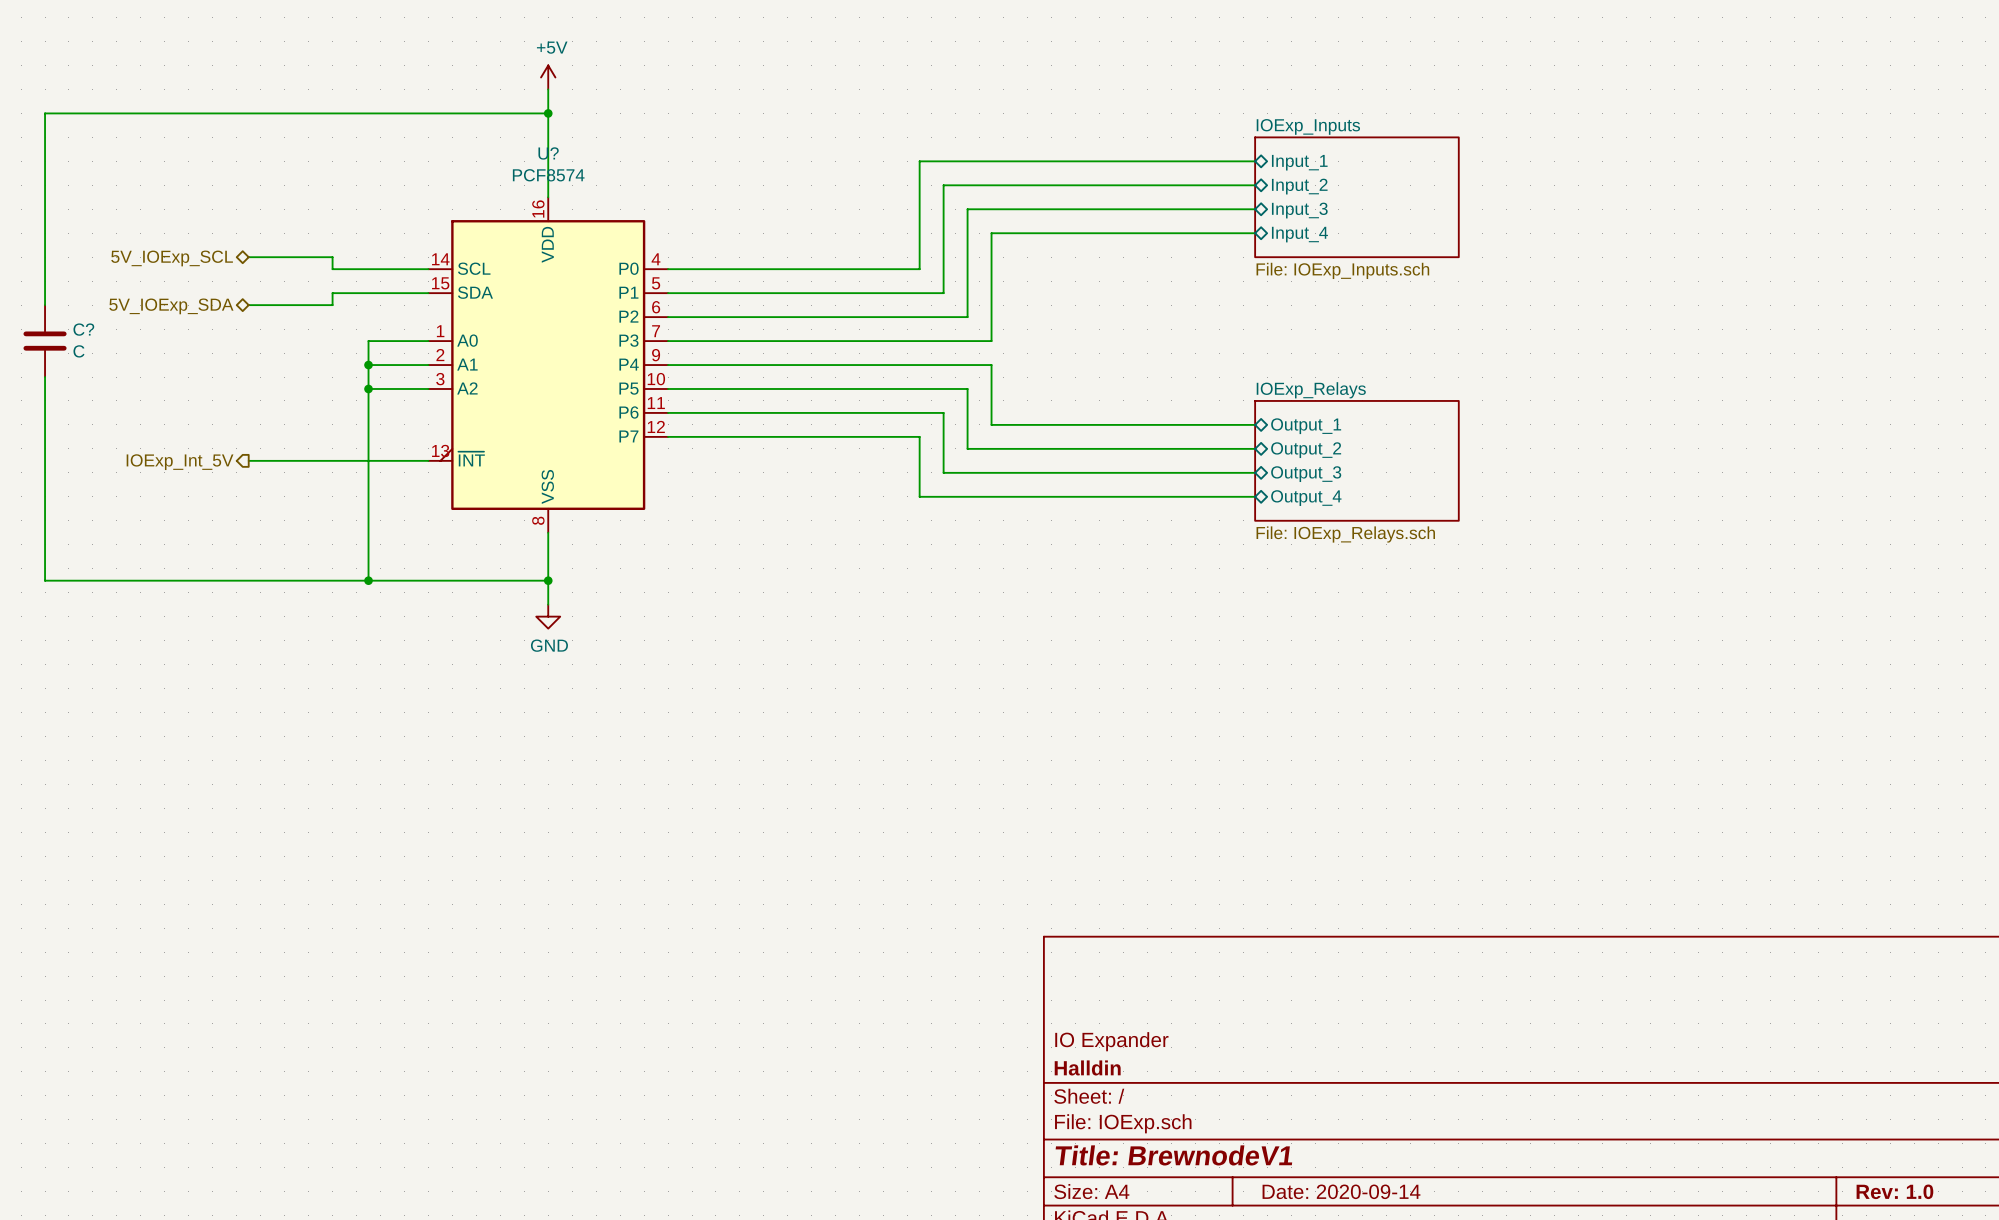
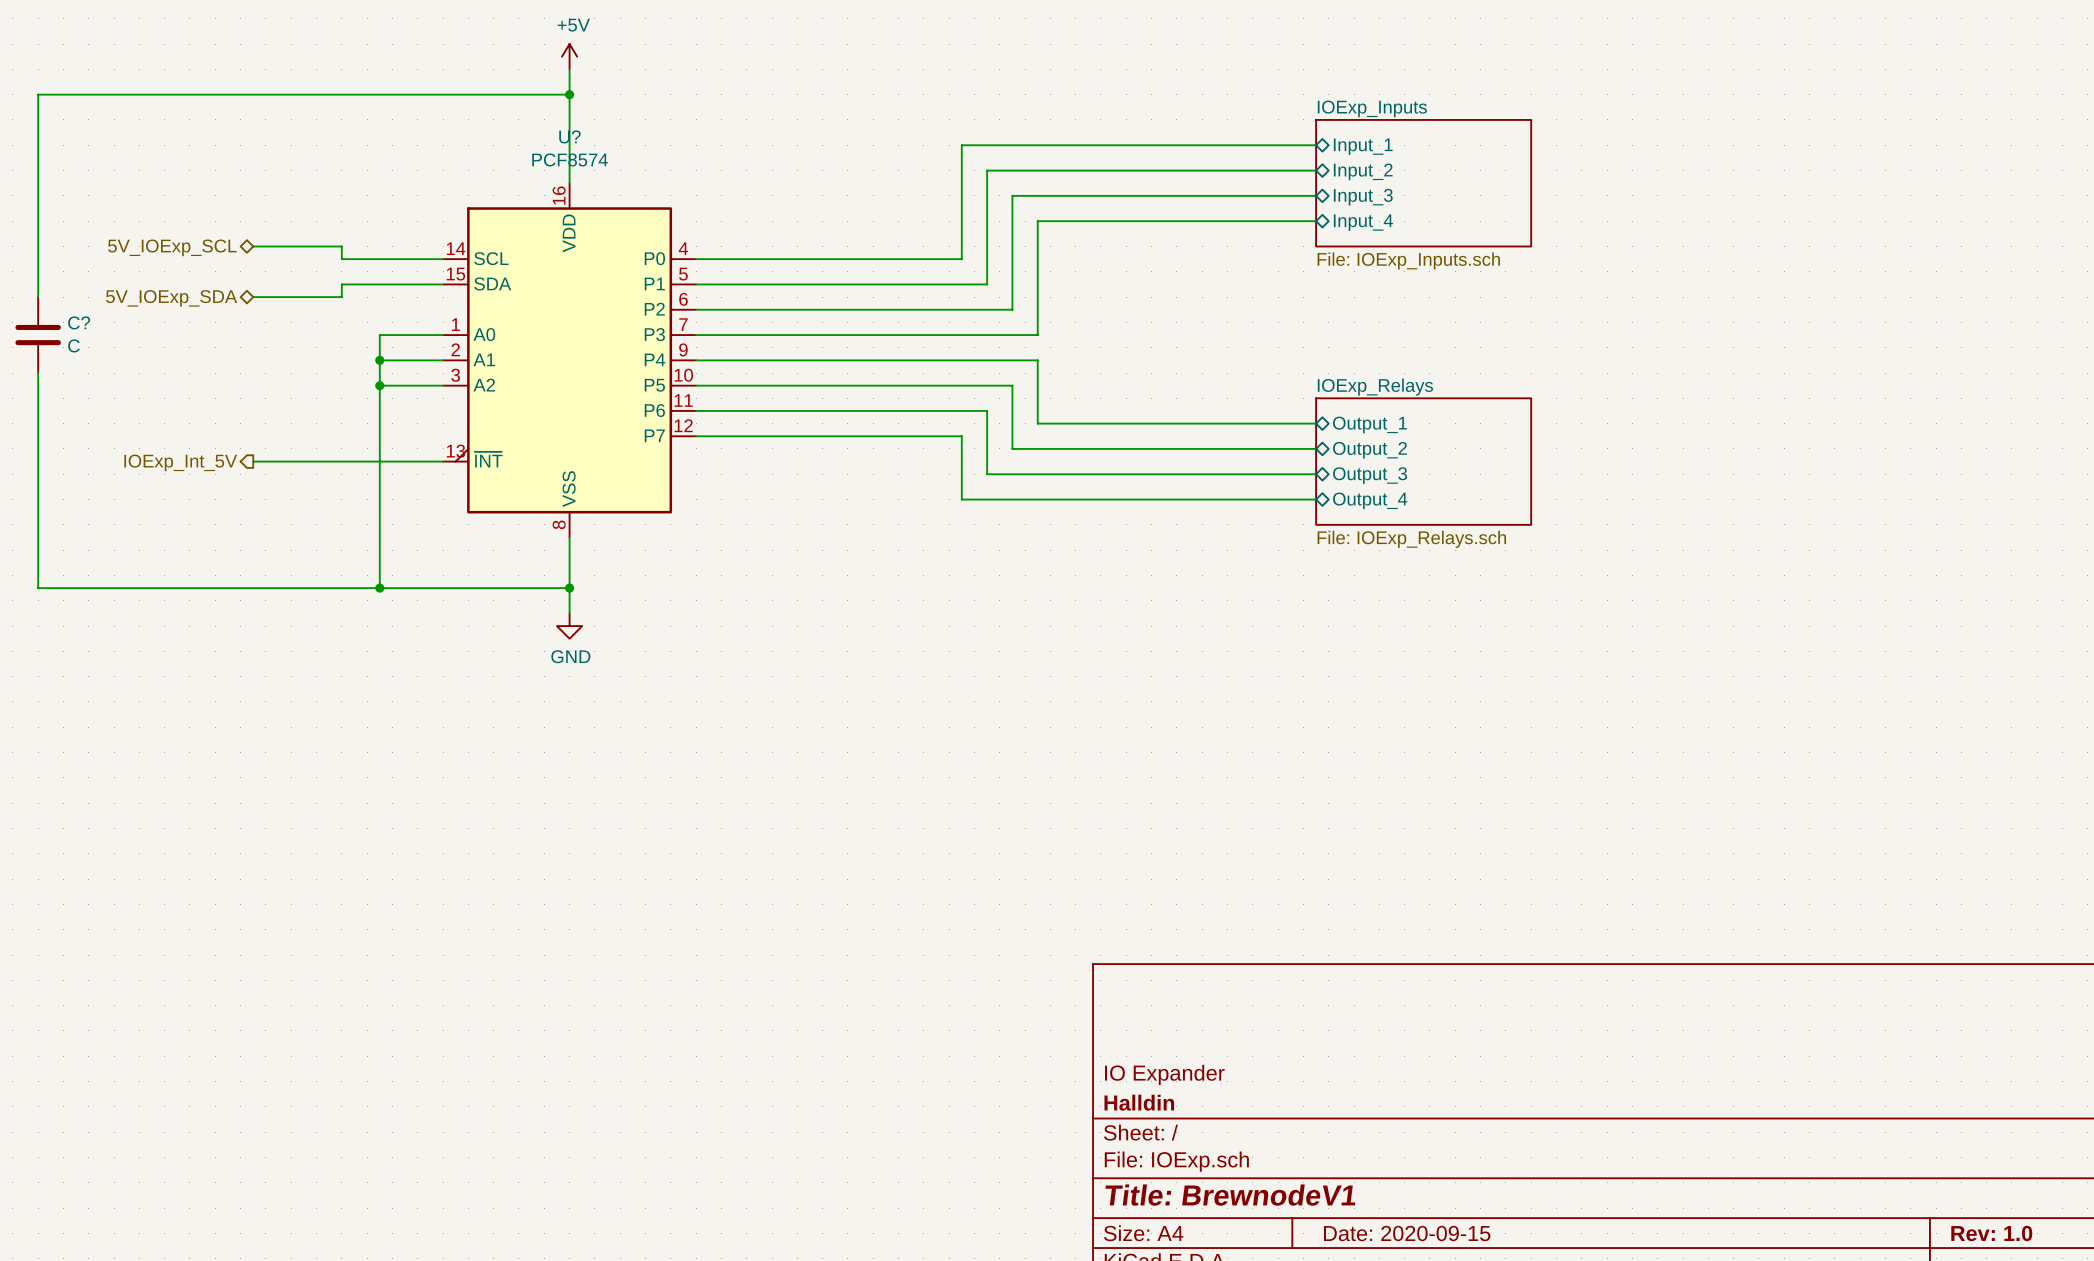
title block: Date: 2020-09-14 (1341, 1191) -> Date: 2020-09-15 (1407, 1233)

